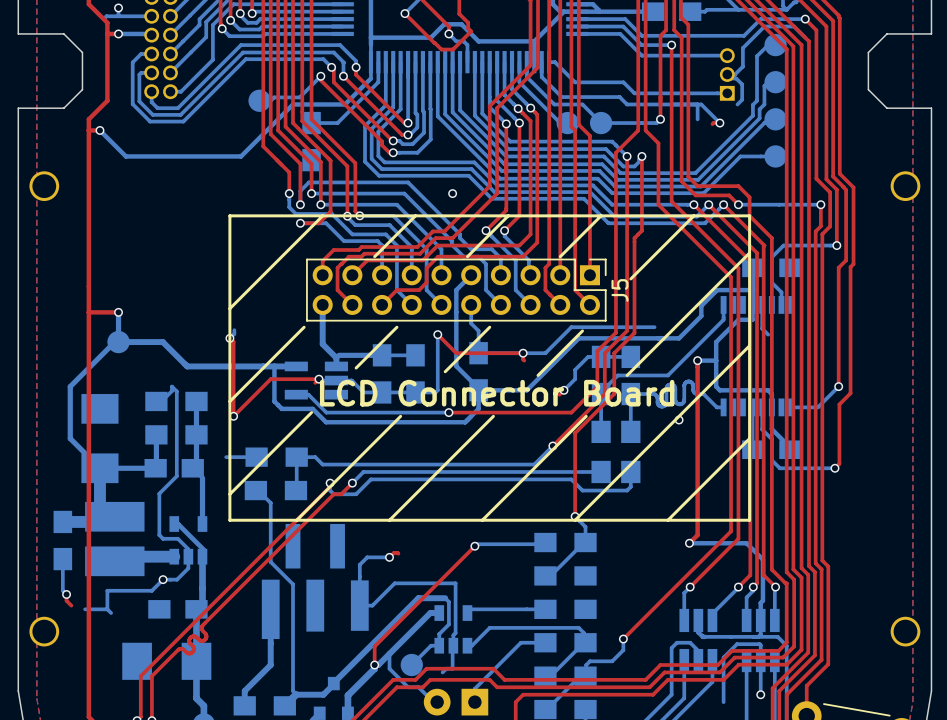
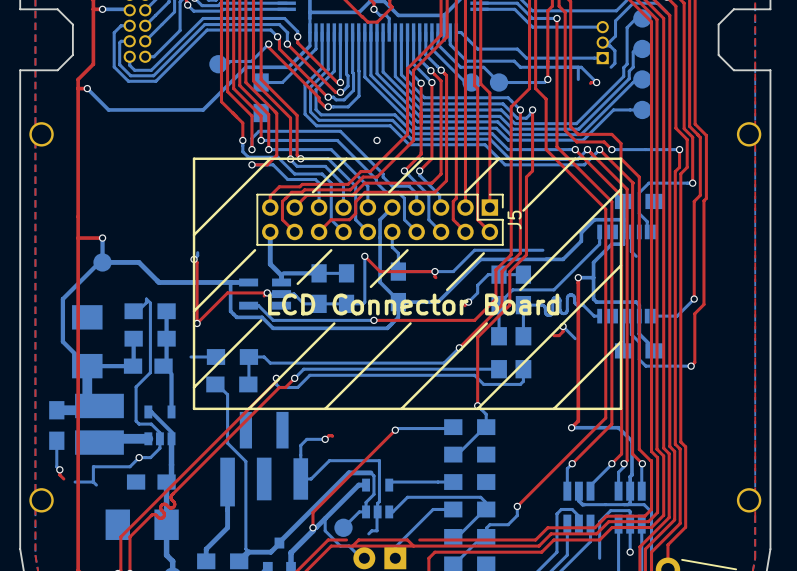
bottom track: none -> (563, 326) (575, 338)
top track: none -> (563, 326) (563, 331) (559, 335) (553, 335)
top track: (415, 679) (426, 668) (493, 668) (504, 679) -> none
top track: none -> (352, 546) (413, 546)

